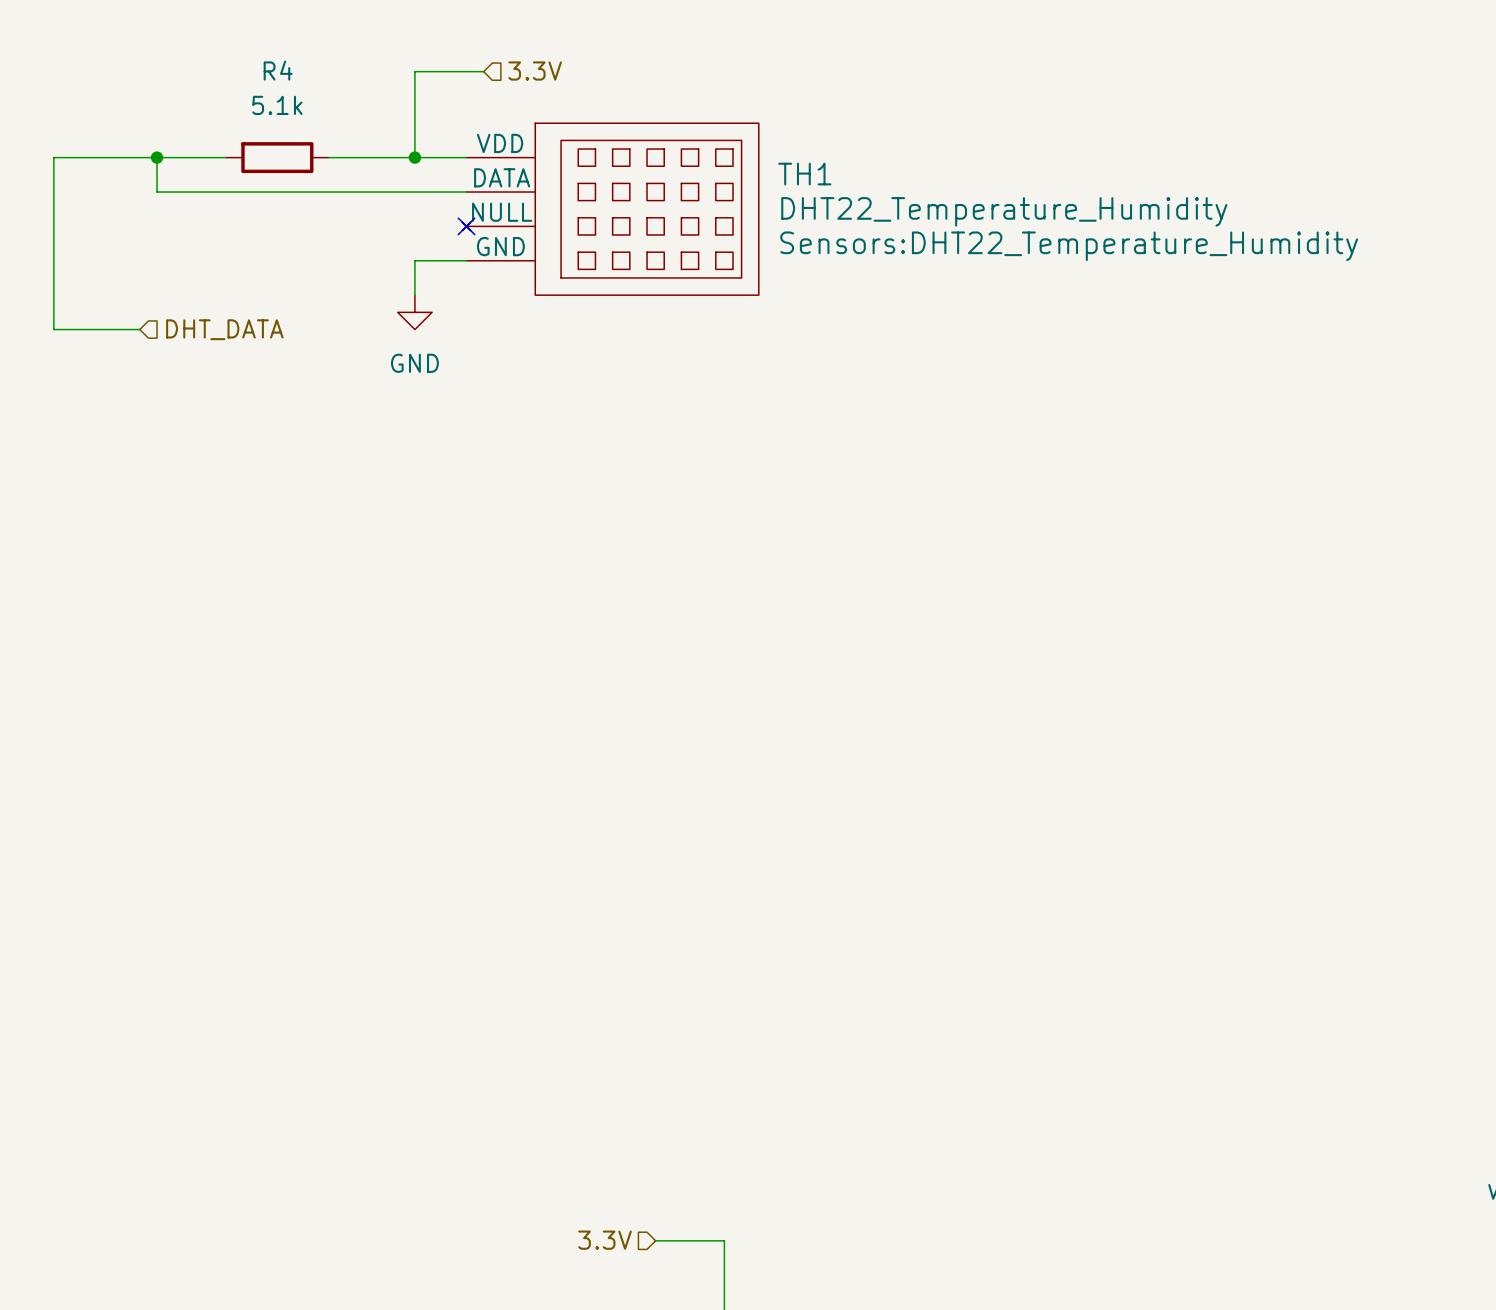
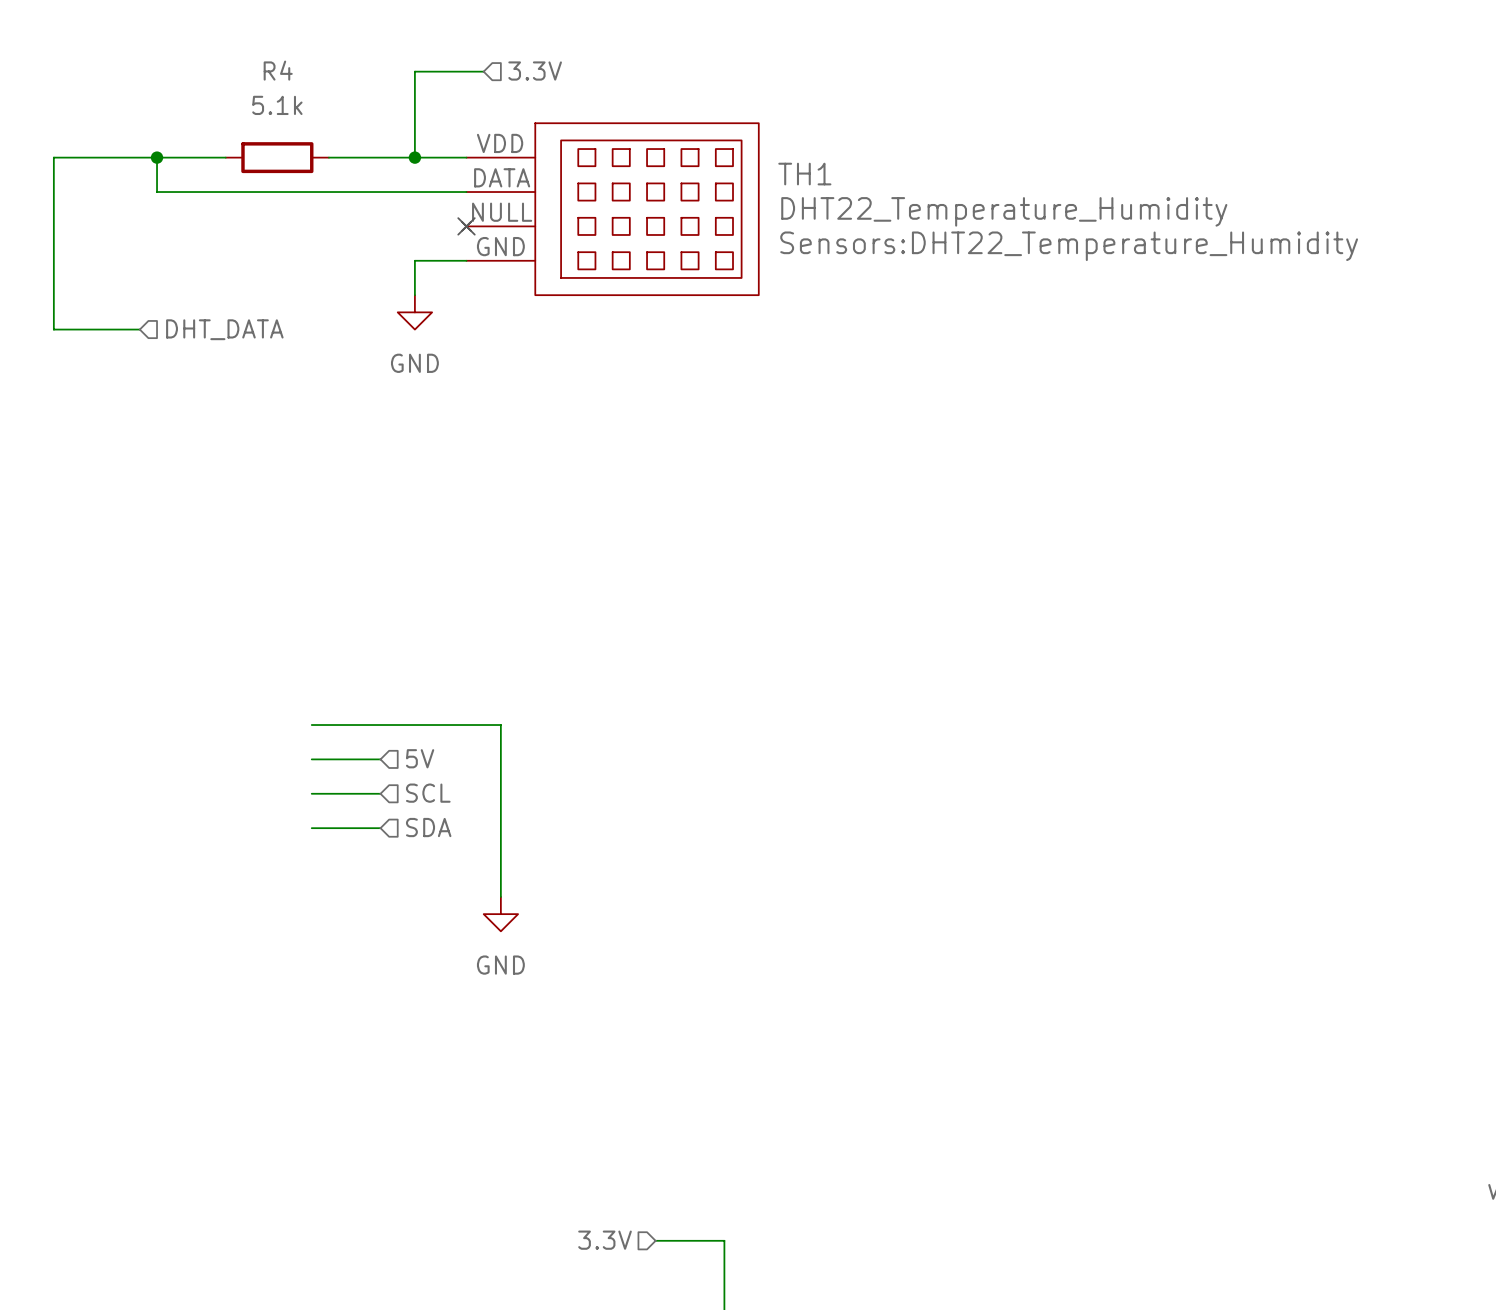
wire: none -> (311, 725) (500, 725) (500, 896)
hierarchical label: none -> 5V (420, 758)
wire: none -> (311, 759) (380, 759)
wire: none -> (311, 793) (380, 793)
hierarchical label: none -> SCL (428, 793)
hierarchical label: none -> SDA (428, 827)
wire: none -> (311, 828) (380, 828)
power symbol: none -> GND (500, 914)

